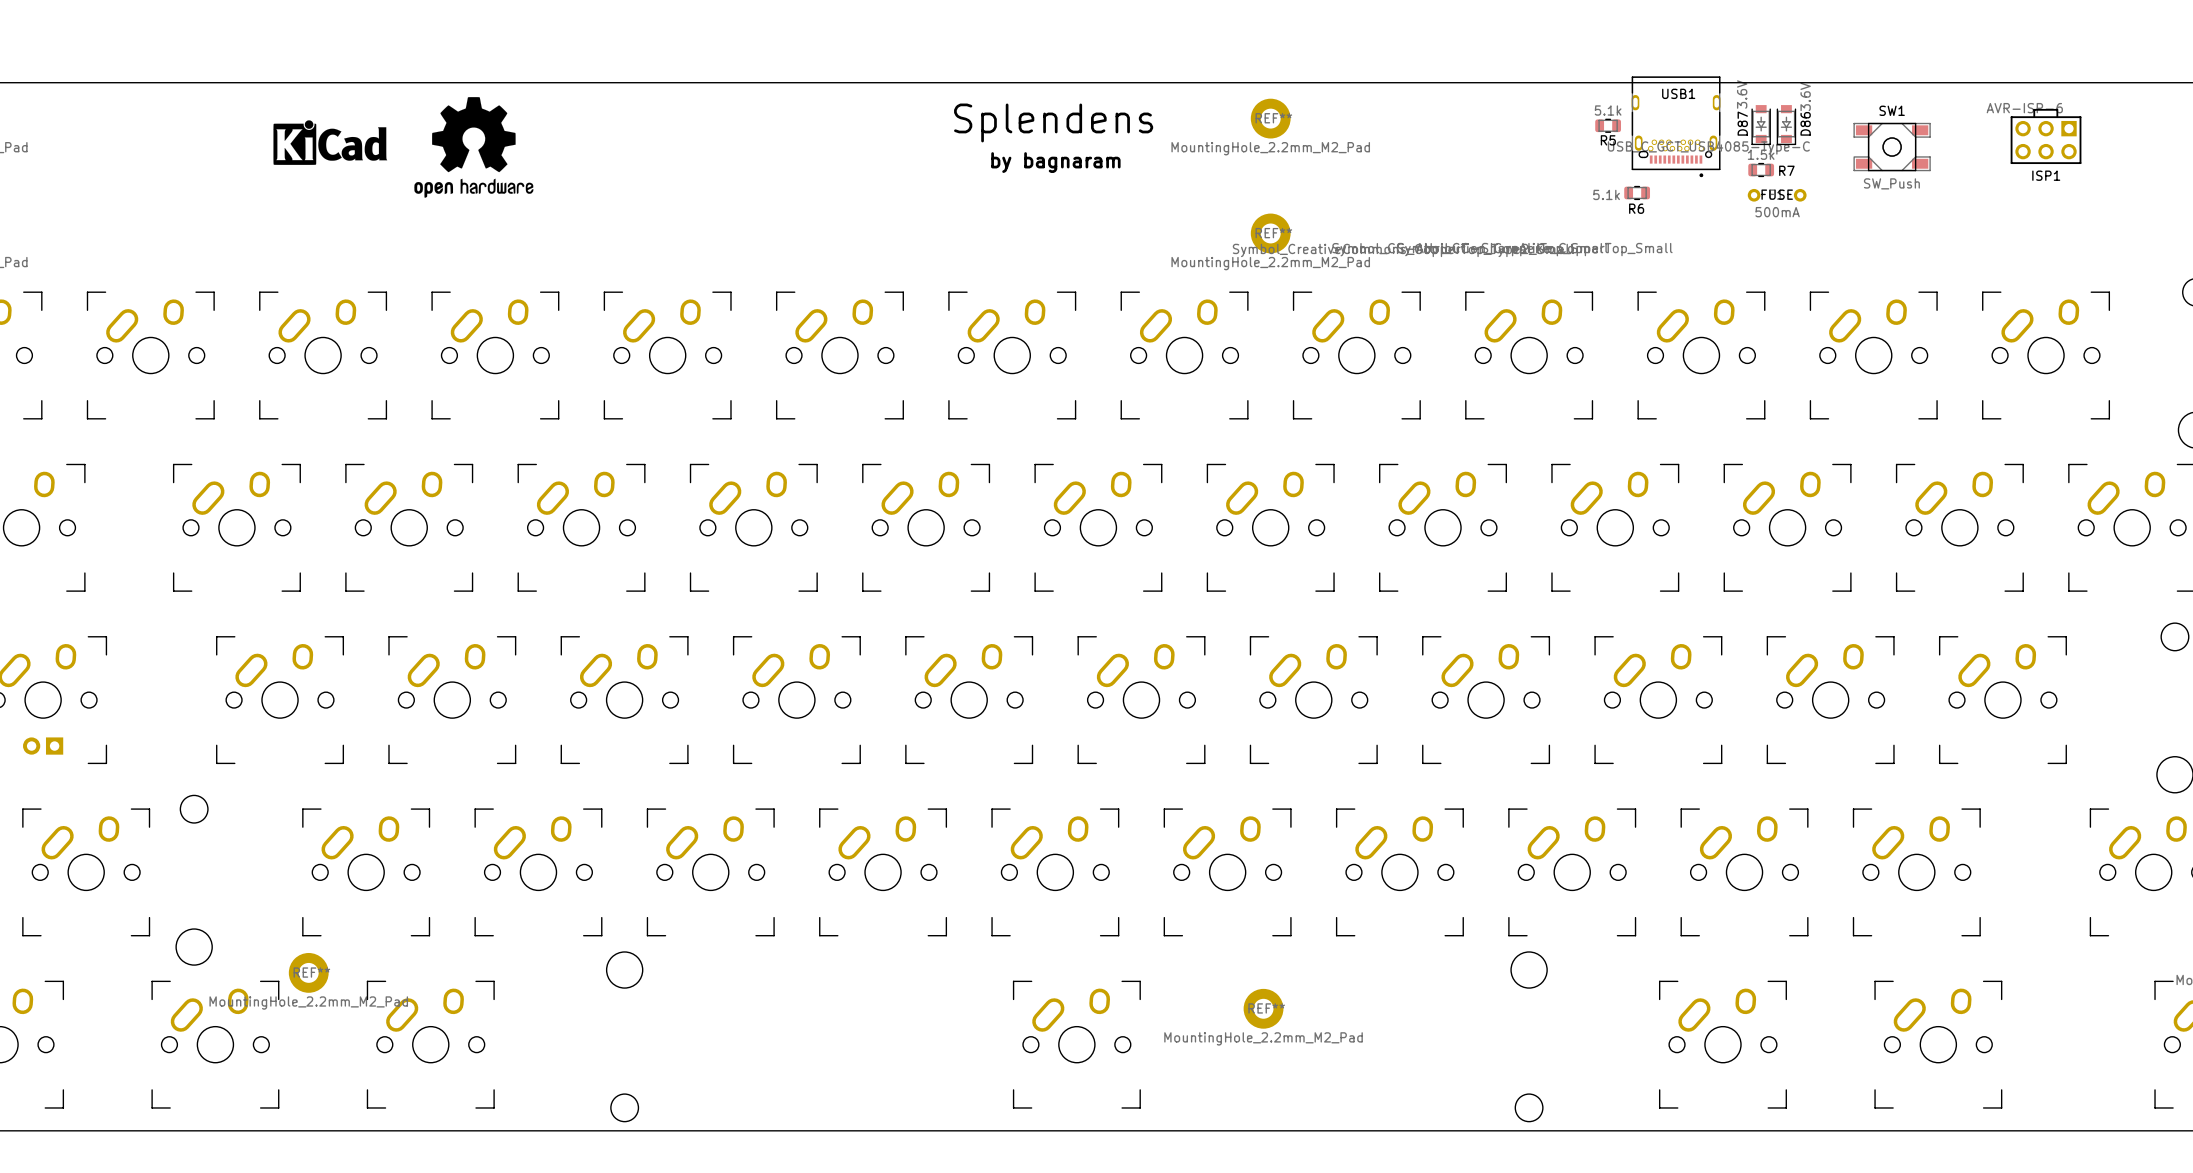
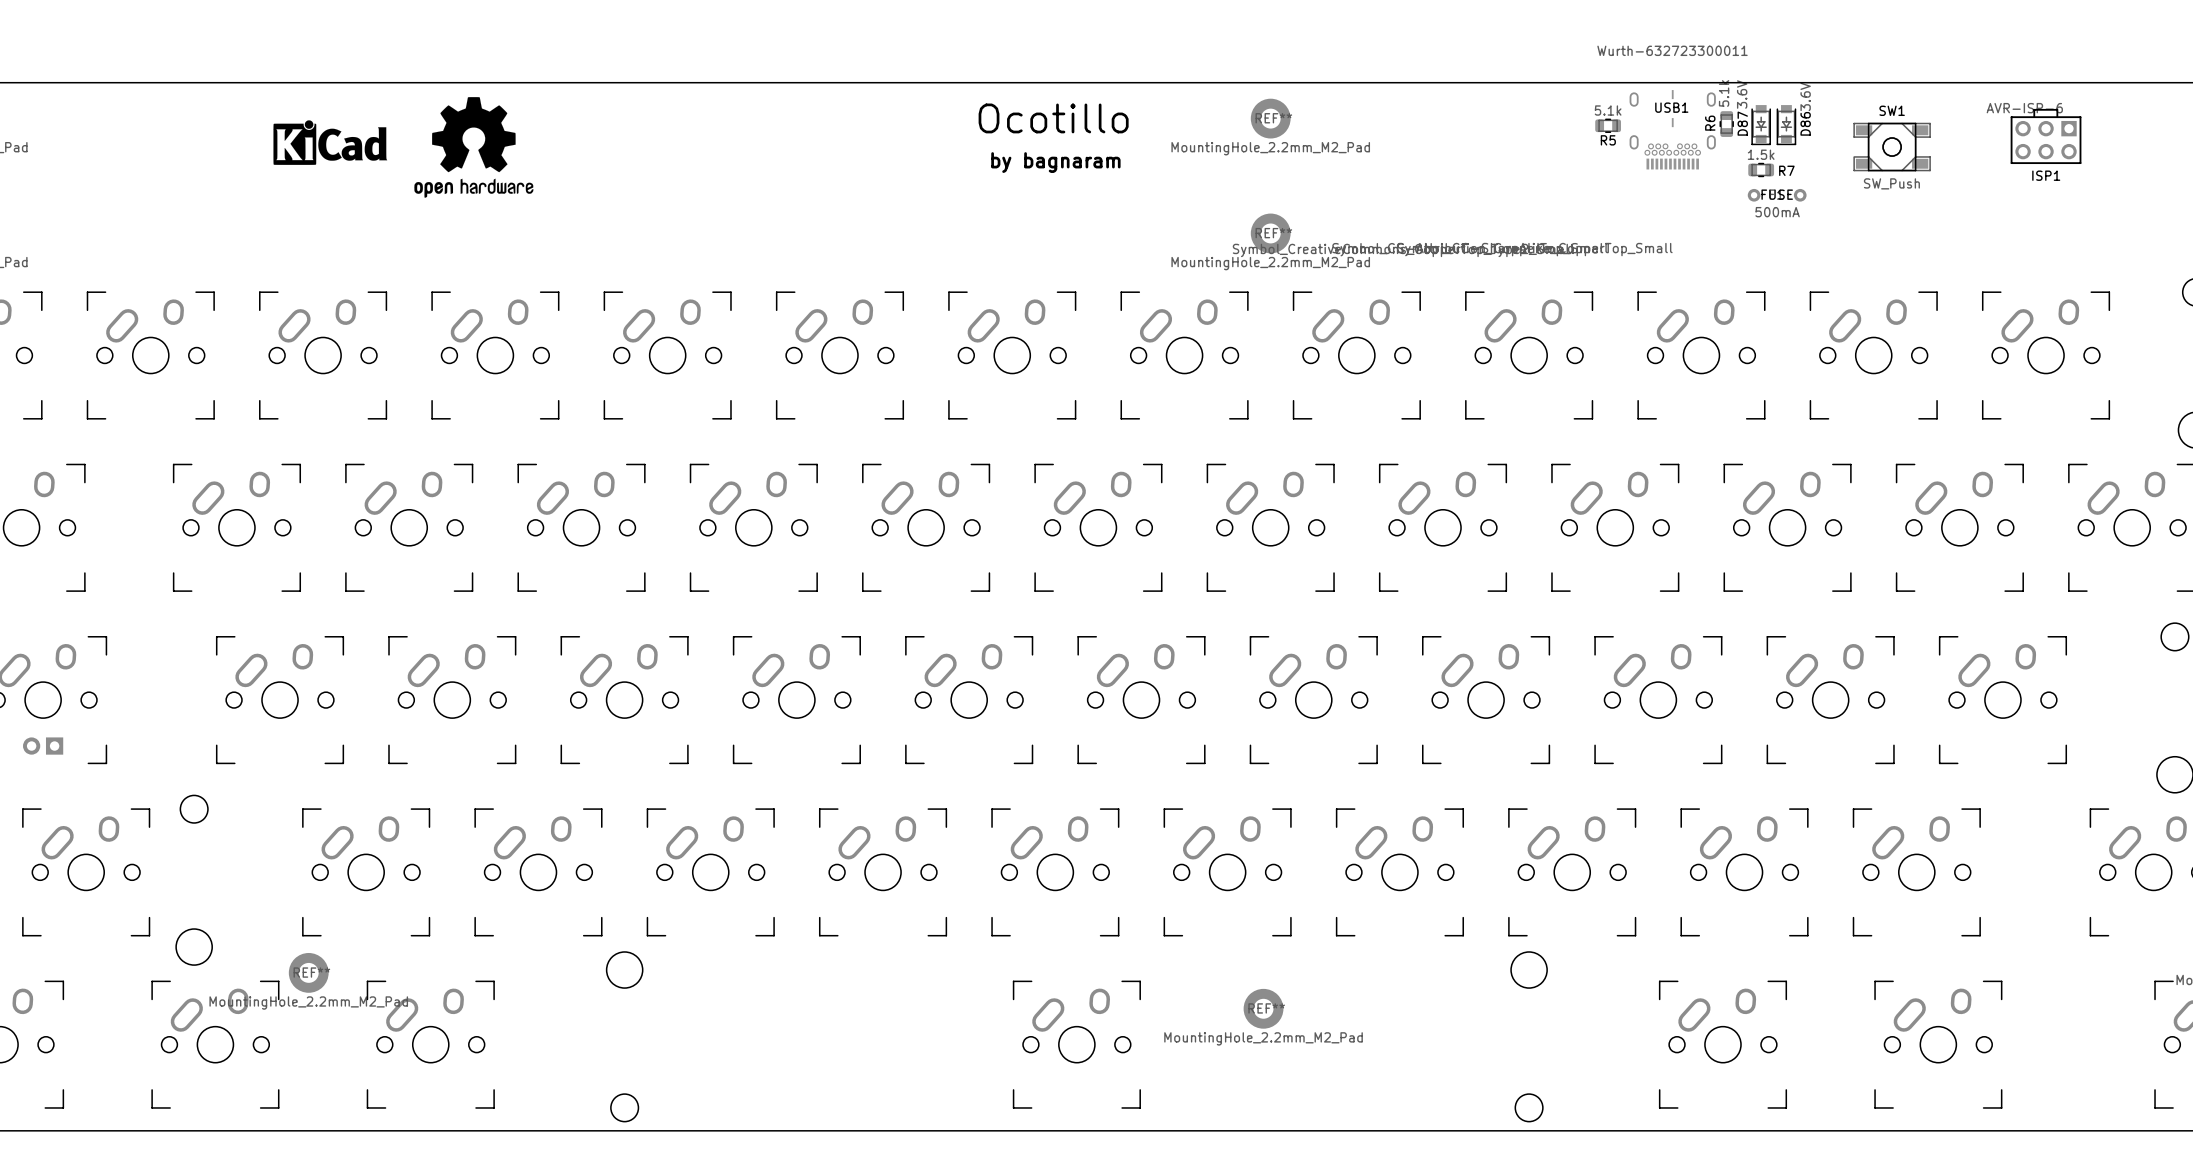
USB1 footprint: [1631, 76, 1721, 178] -> [1629, 90, 1716, 170]
text: Splendens (1053, 122) -> Ocotillo (1053, 118)
USB1 value: USB_C_GCT_USB4085-Type-C (1708, 147) -> Wurth-632723300011 (1672, 50)
R6 rotation: 0° (1637, 192) -> 90° clockwise (1726, 124)
R6 position: (1637, 192) -> (1726, 124)

